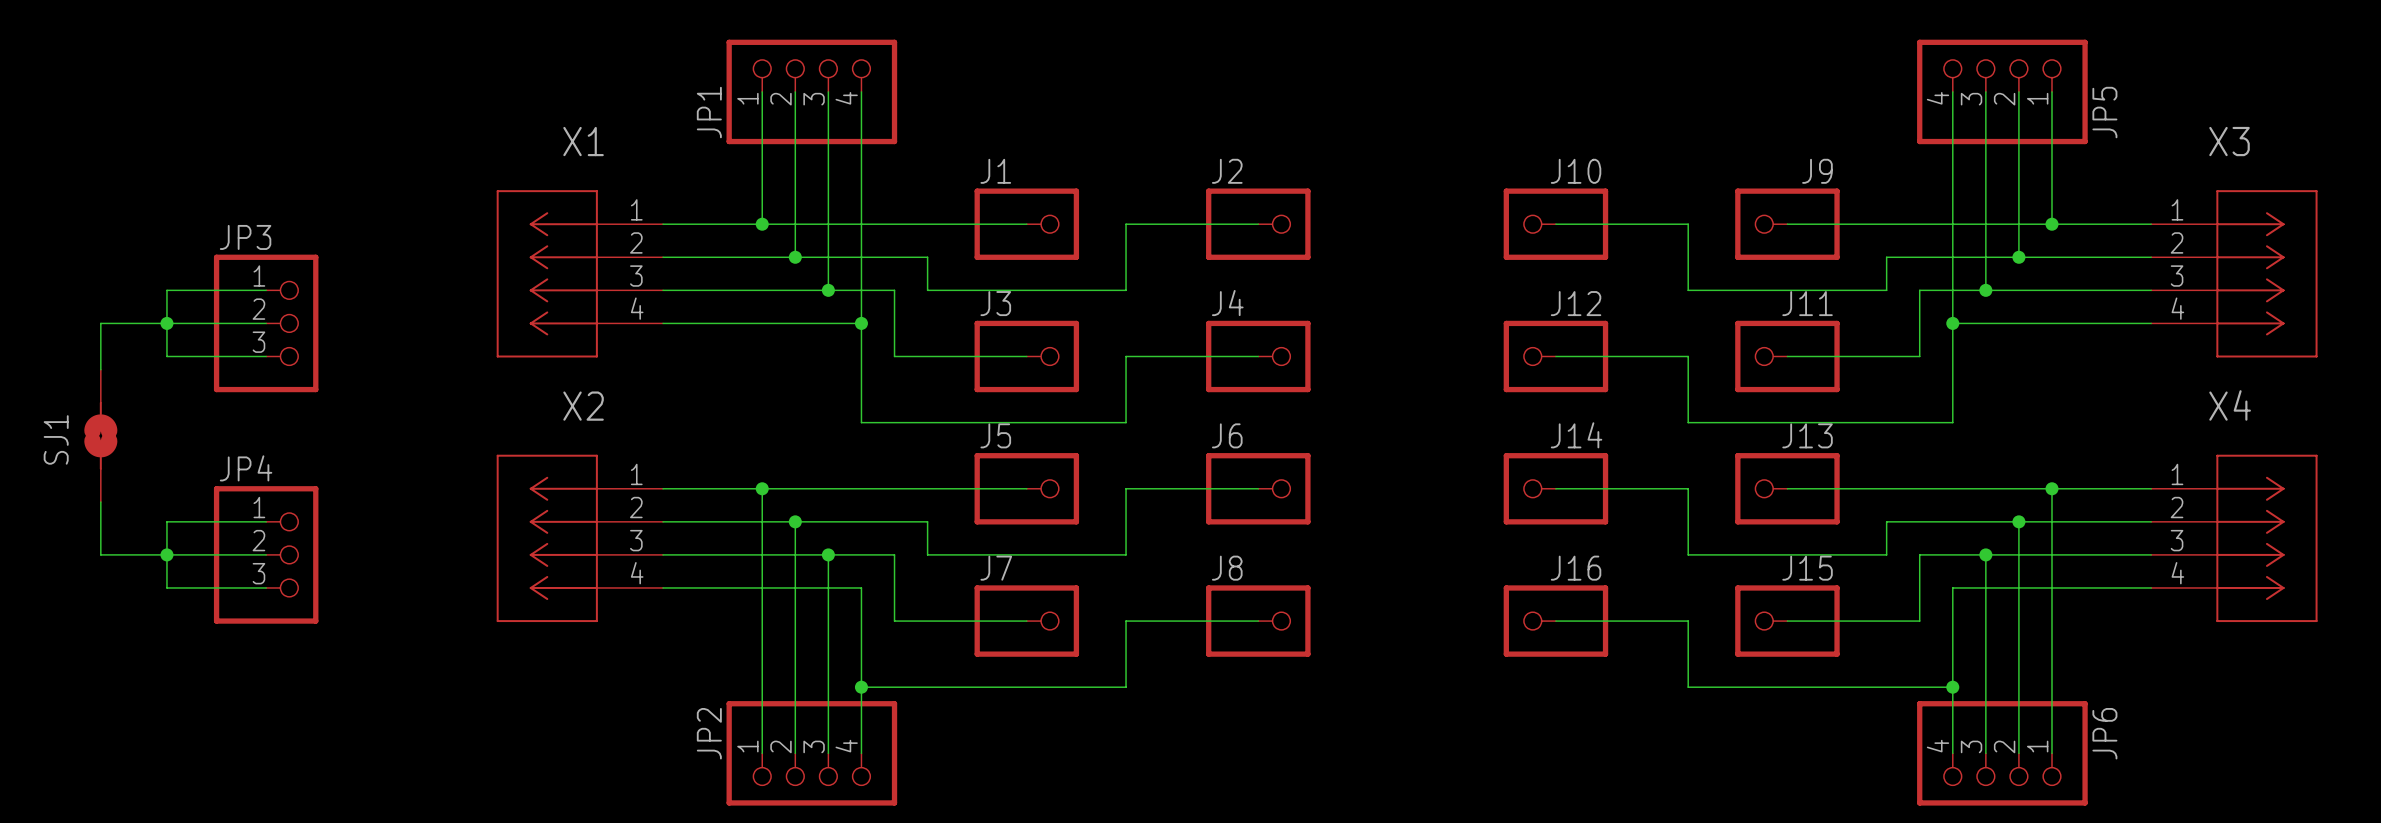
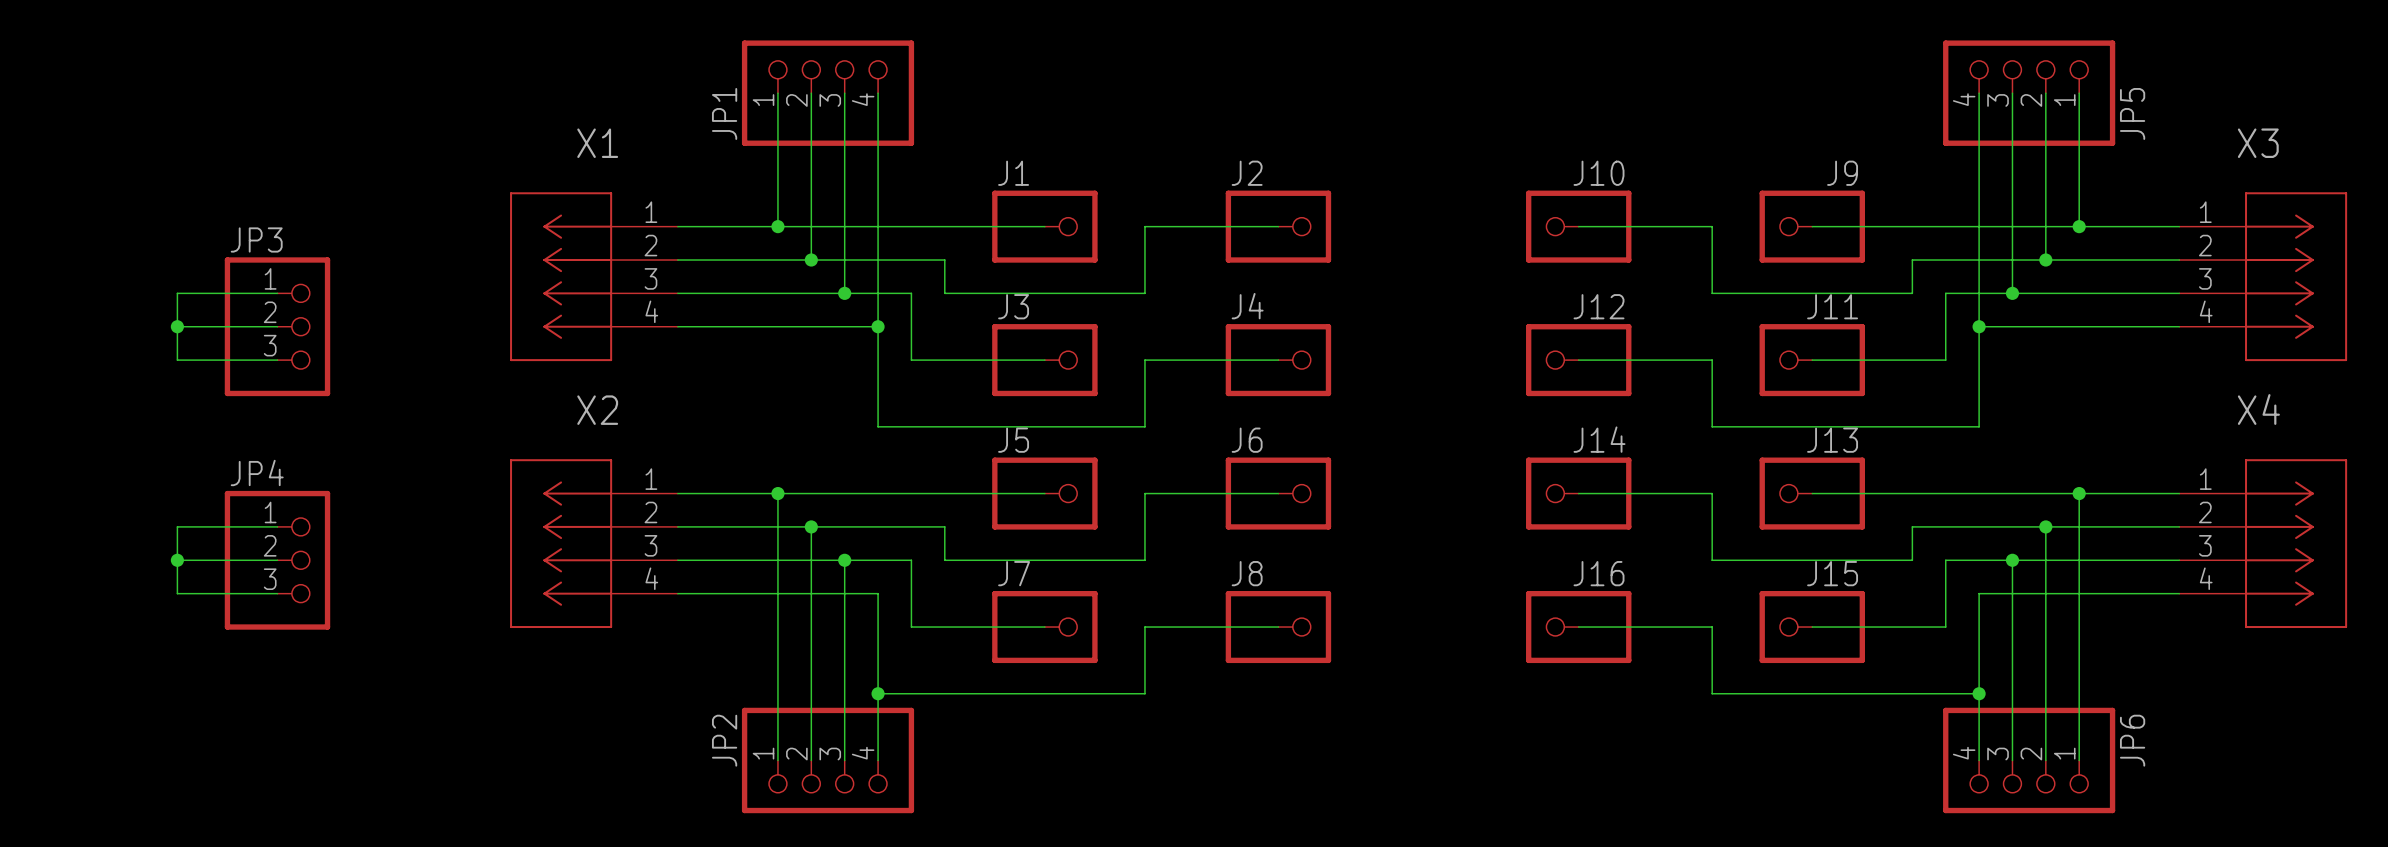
wire: (166, 323) (100, 323) (100, 369) -> none
SJ1: (100, 435) -> none
wire: (100, 502) (100, 554) (166, 554) -> none

